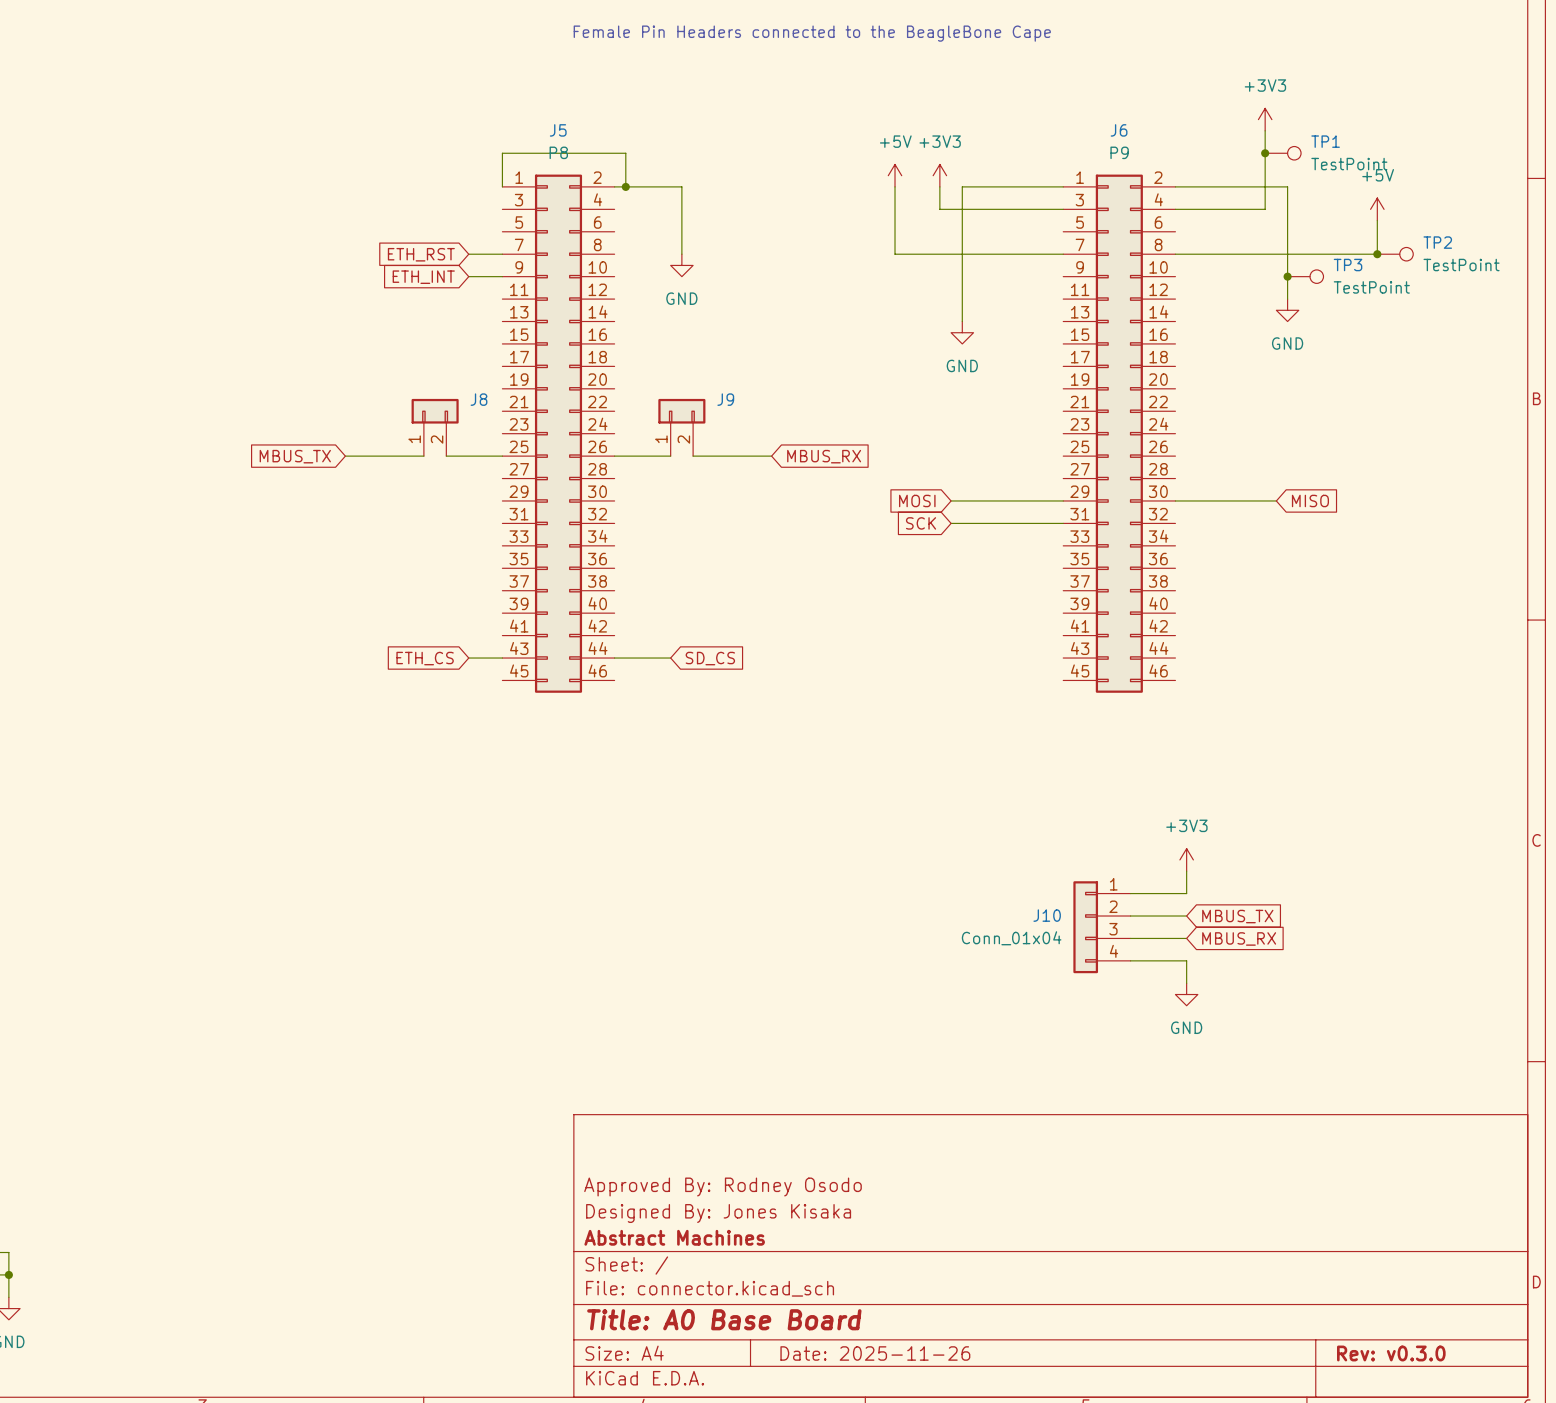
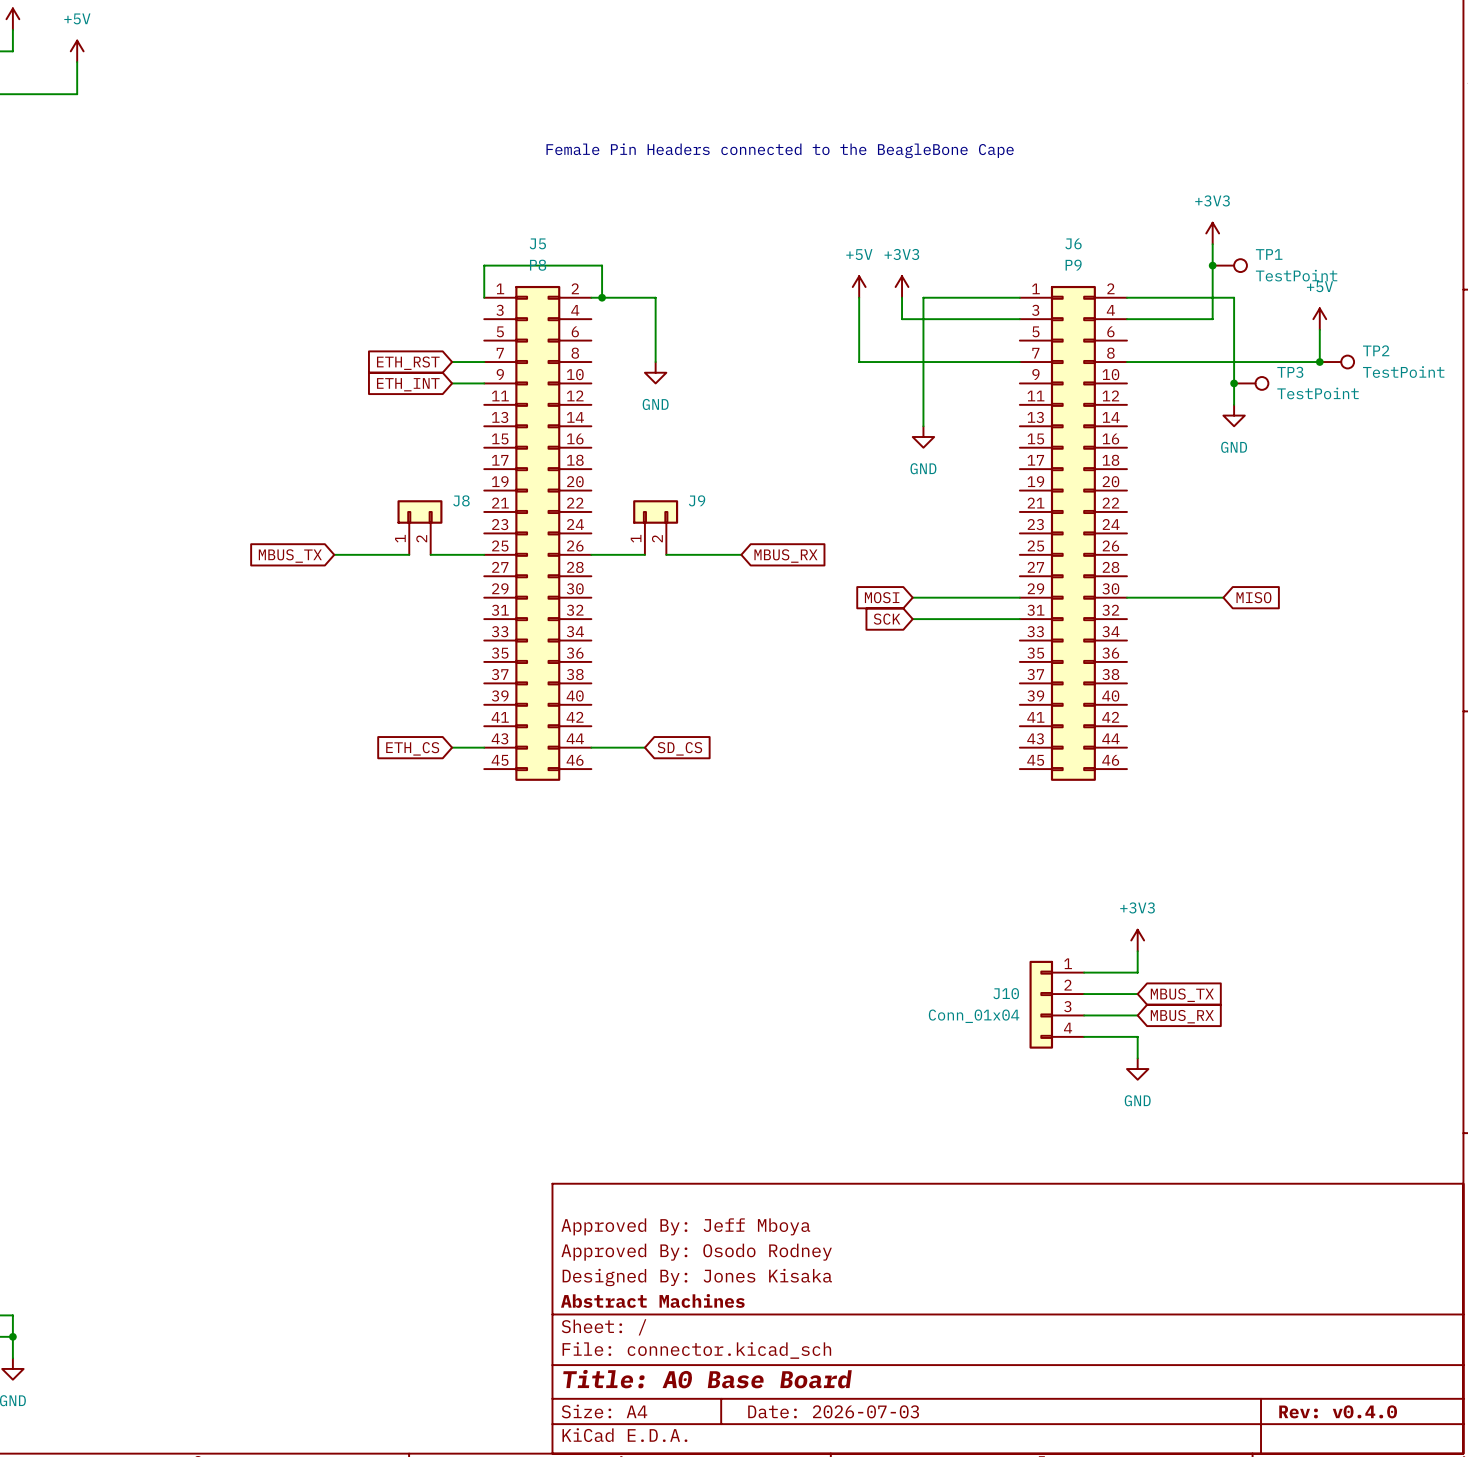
title block: none -> Approved By: Jeff Mboya (685, 1226)
title block: Approved By: Rodney Osodo (723, 1187) -> Approved By: Osodo Rodney (696, 1252)
title block: Date: 2025-11-26 (875, 1353) -> Date: 2026-07-03 (833, 1411)
title block: Rev: v0.3.0 (1391, 1353) -> Rev: v0.4.0 (1338, 1411)

